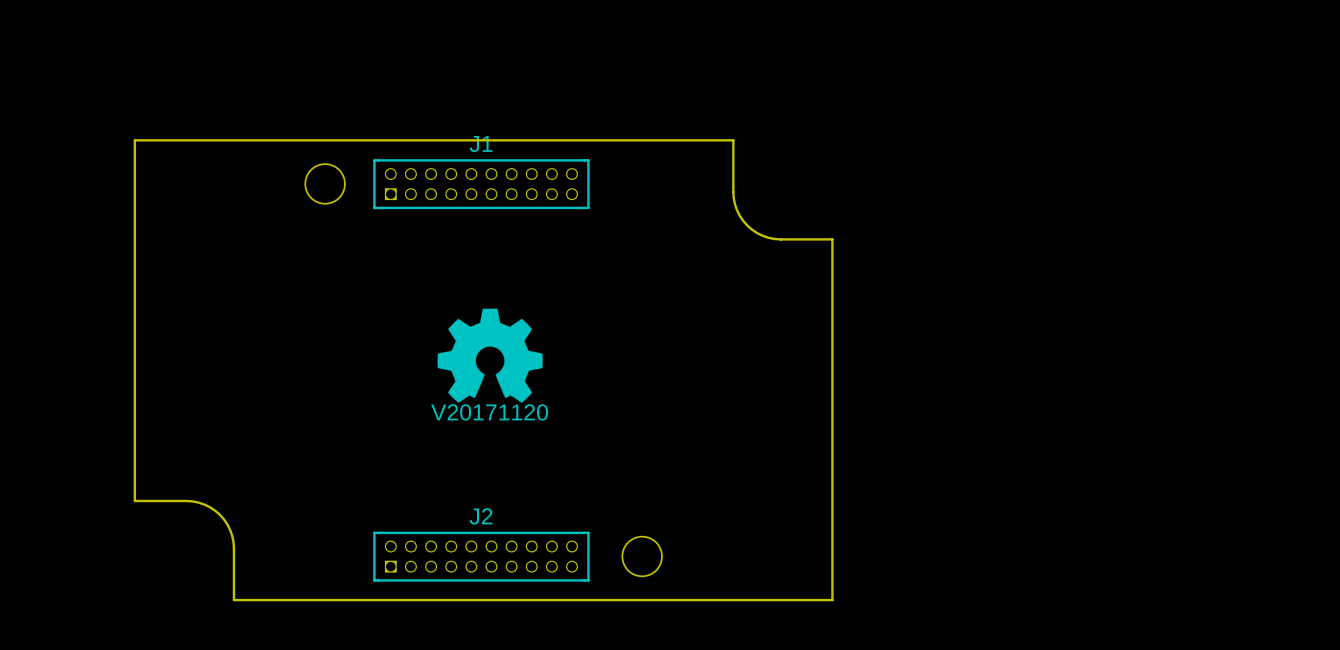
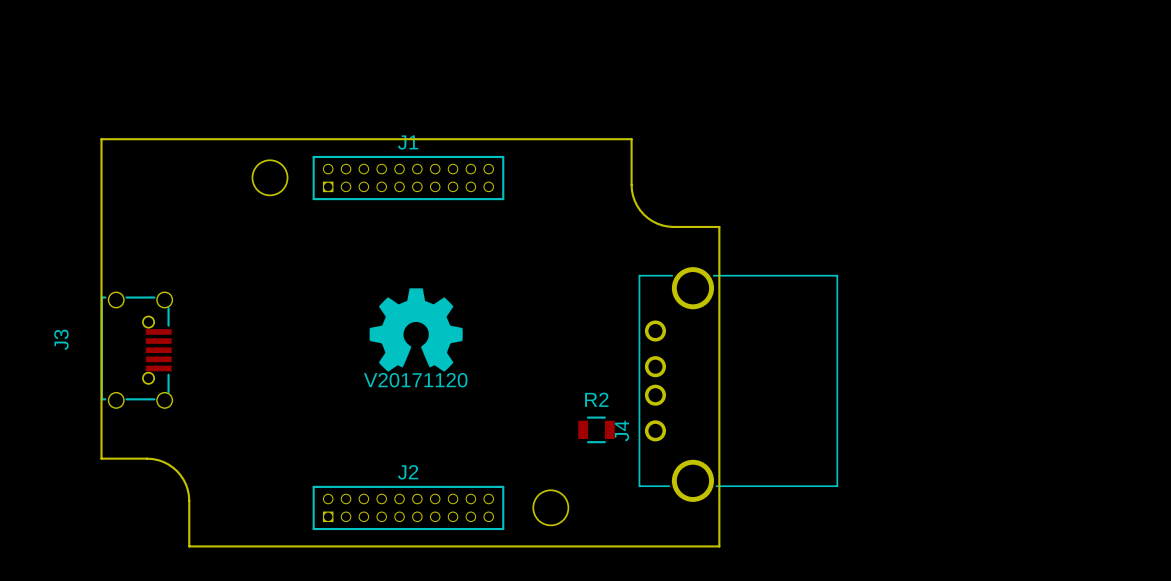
J3: none -> (136, 350)
J4: none -> (738, 384)
R2: none -> (596, 429)

